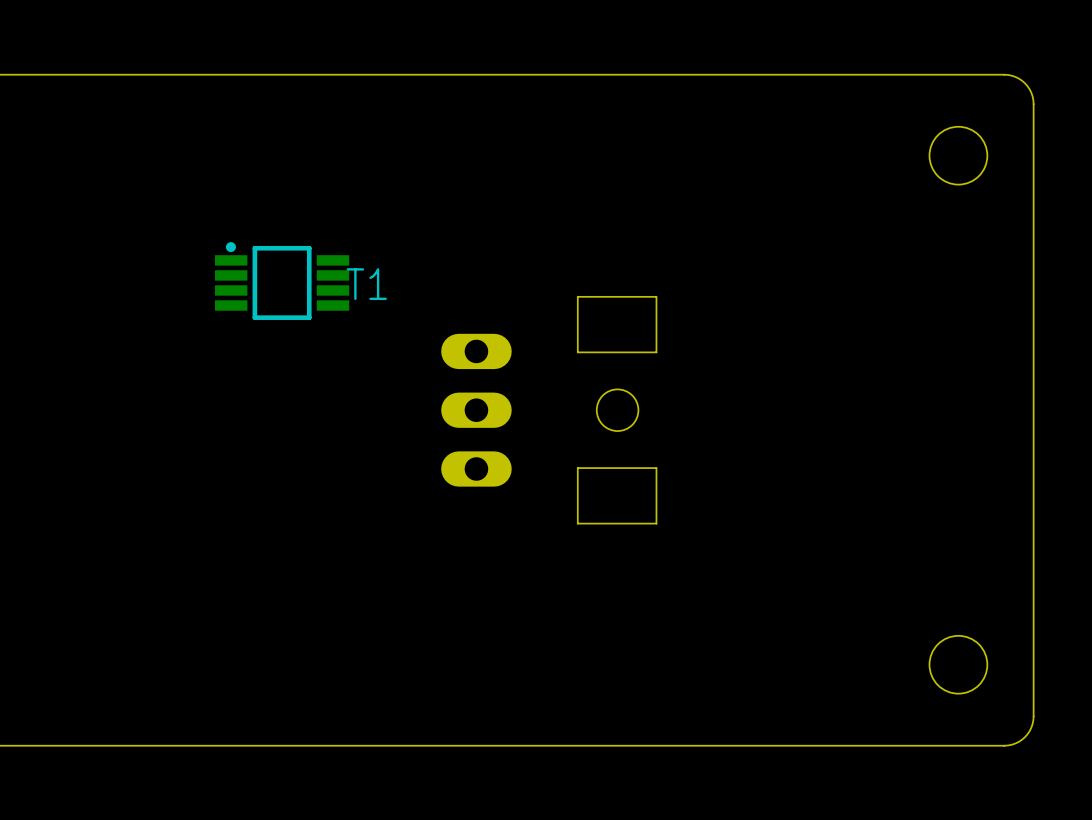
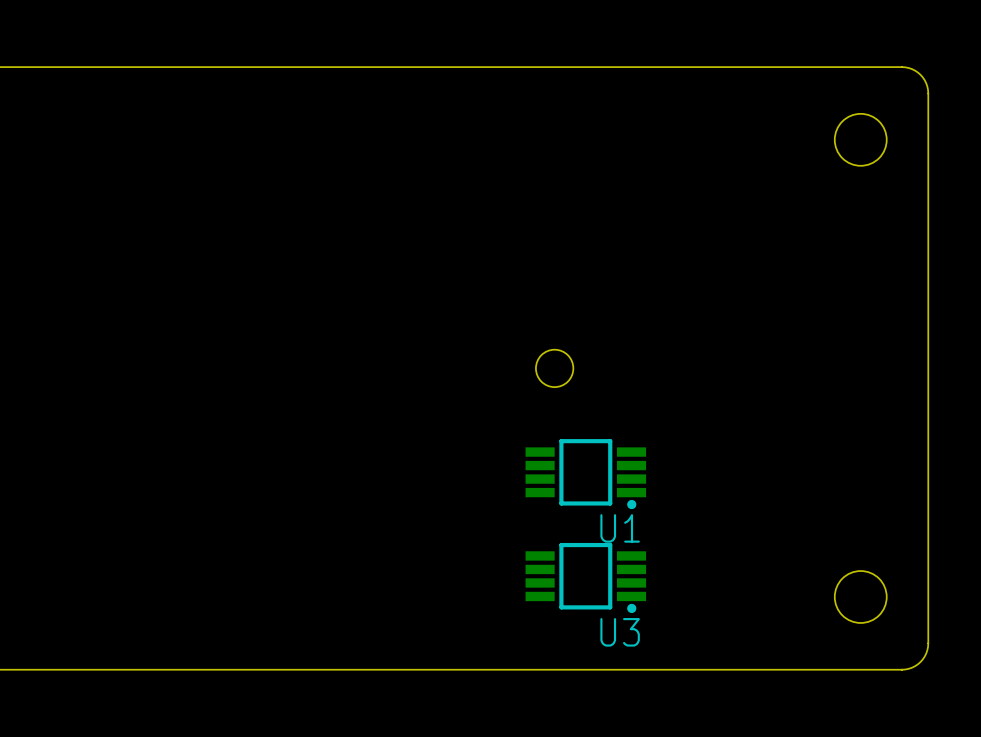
T1: (282, 281) -> none
board edge: (656, 296) (656, 352) (577, 352) (577, 296) (656, 296) -> none
part: (476, 410) -> none
board edge: (656, 468) (656, 523) (577, 523) (577, 468) (656, 468) -> none
U1: none -> (585, 473)
U3: none -> (585, 577)

